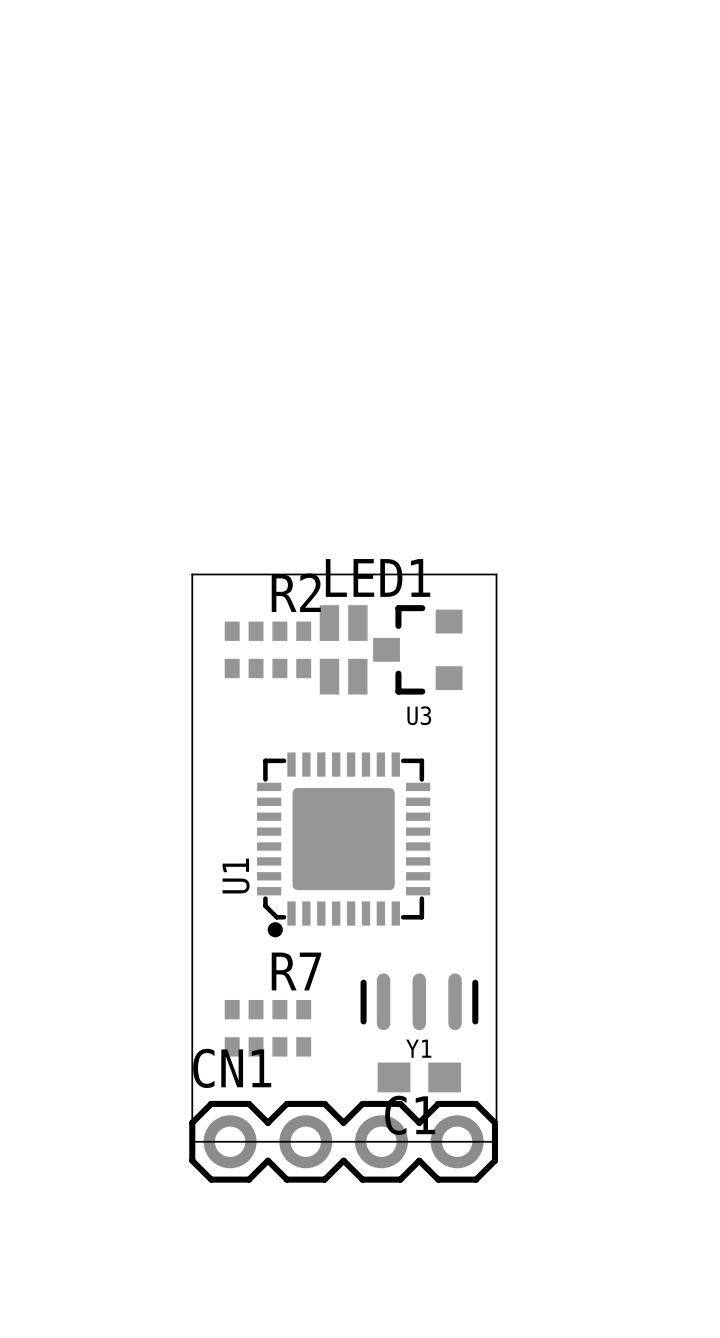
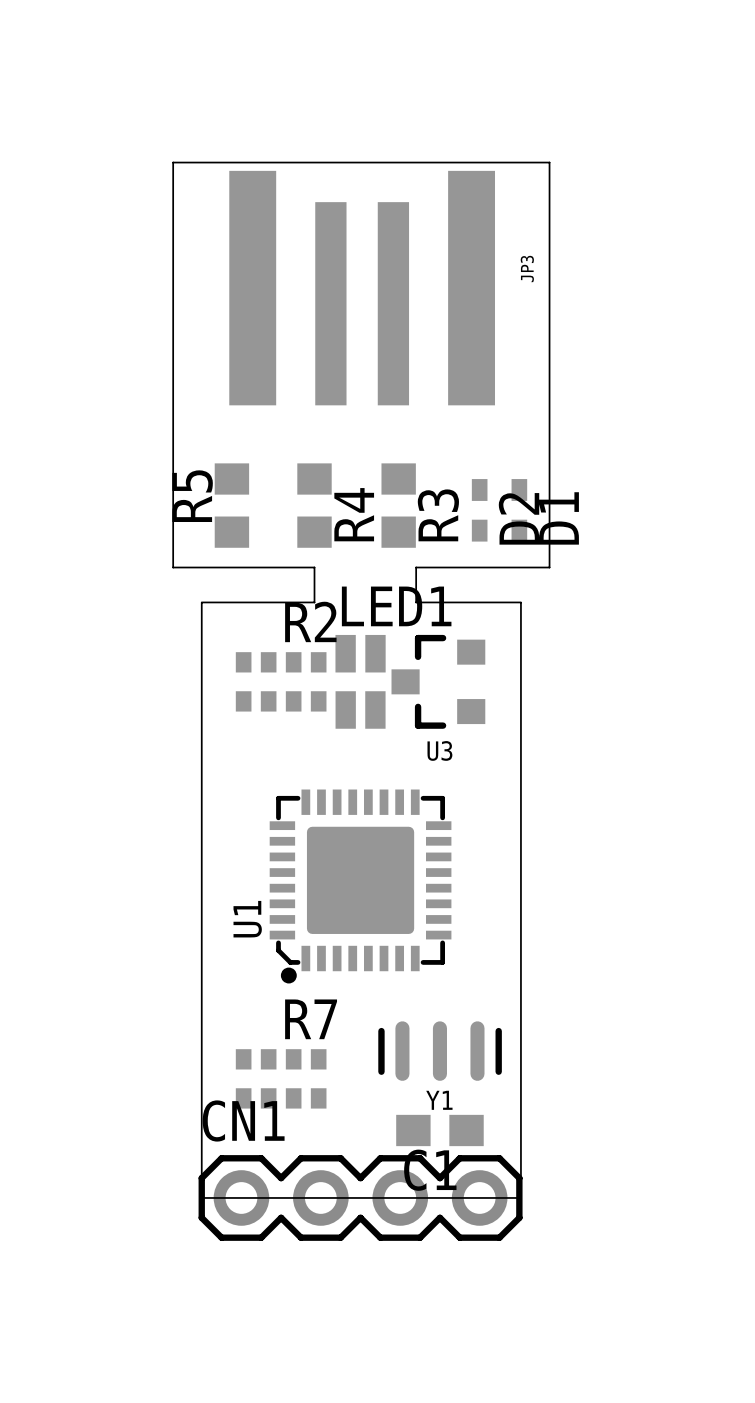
JP3: none -> (362, 288)
R5: none -> (231, 505)
R4: none -> (314, 505)
R3: none -> (398, 505)
D2: none -> (479, 510)
D1: none -> (519, 510)
board edge: (192, 574) (496, 574) -> (201, 602) (314, 602) (314, 567) (173, 567) (173, 162) (549, 162) (549, 567) (416, 567) (416, 602) (520, 602)

